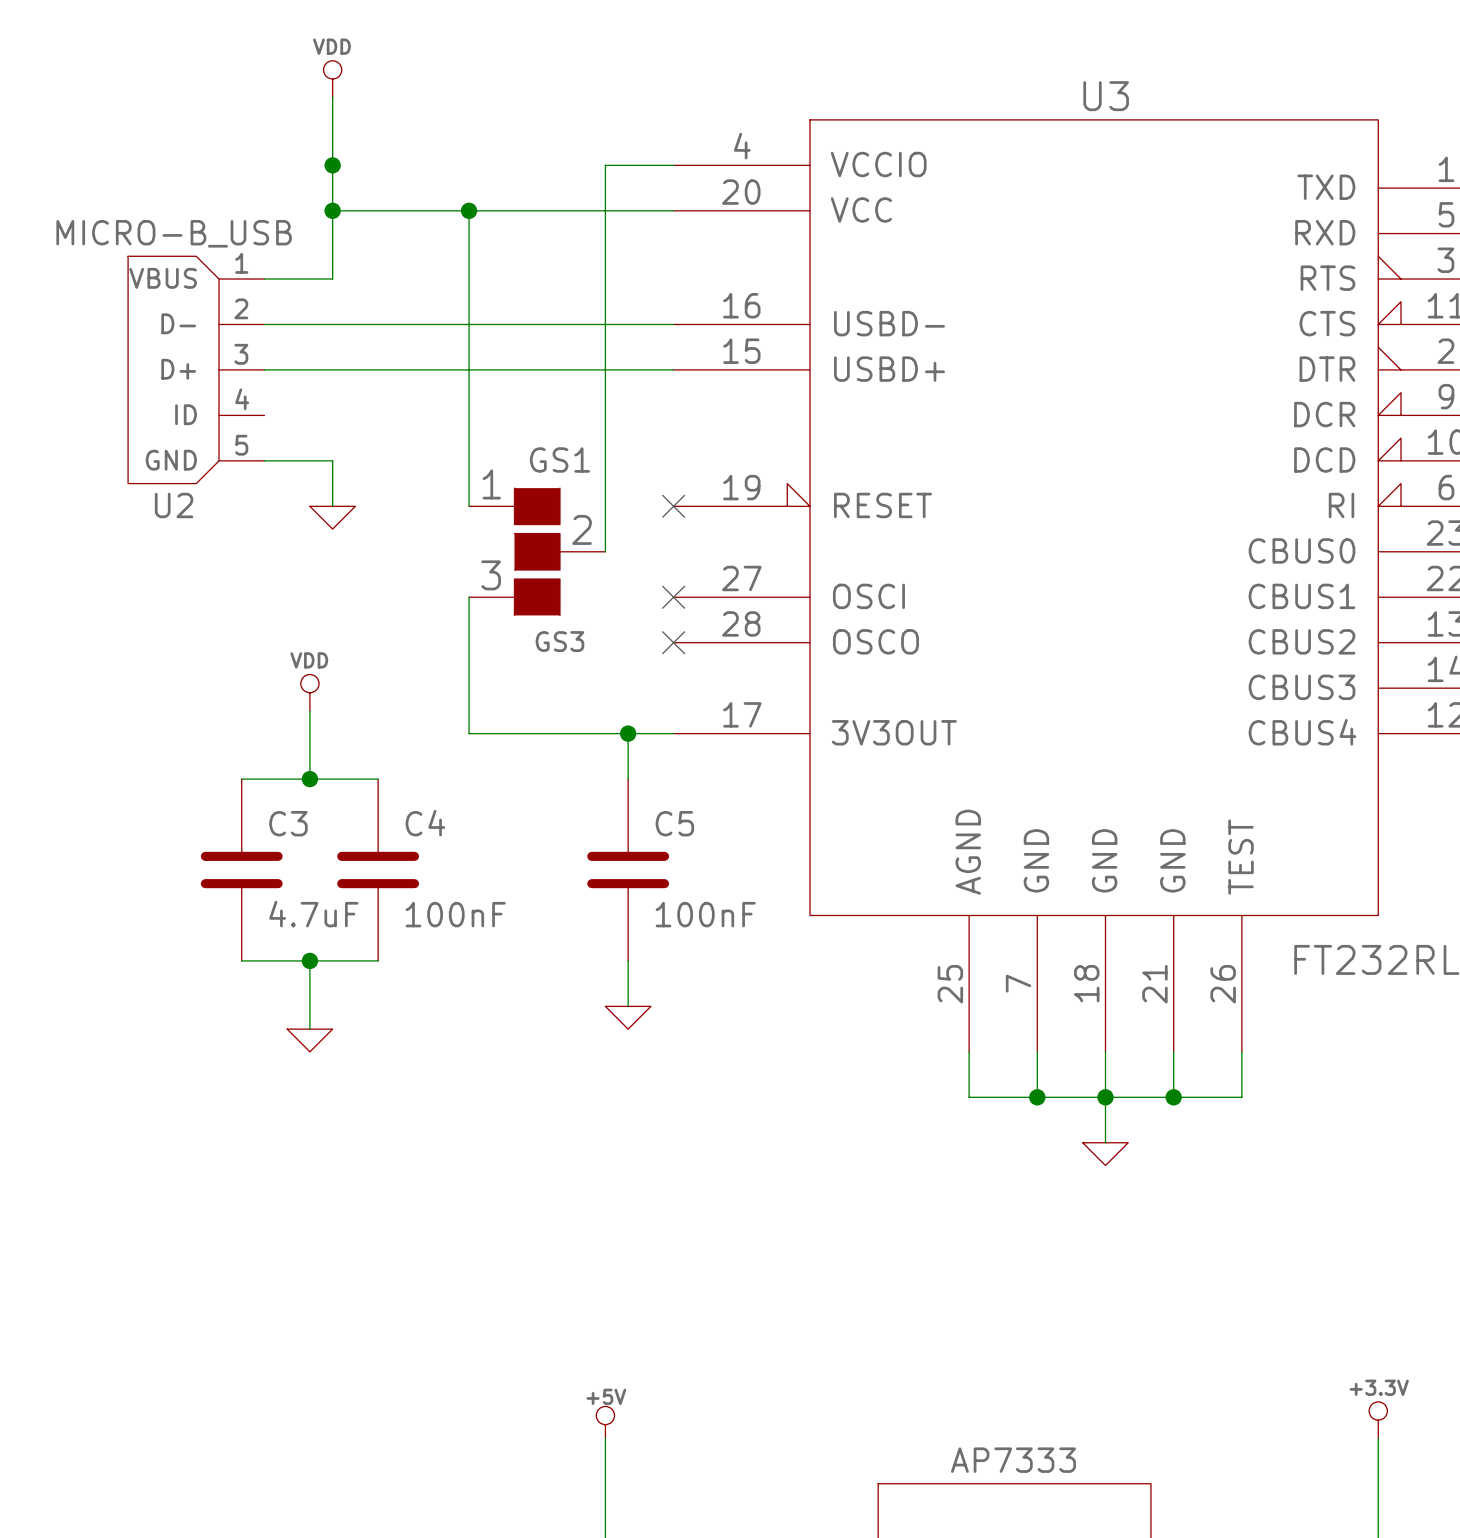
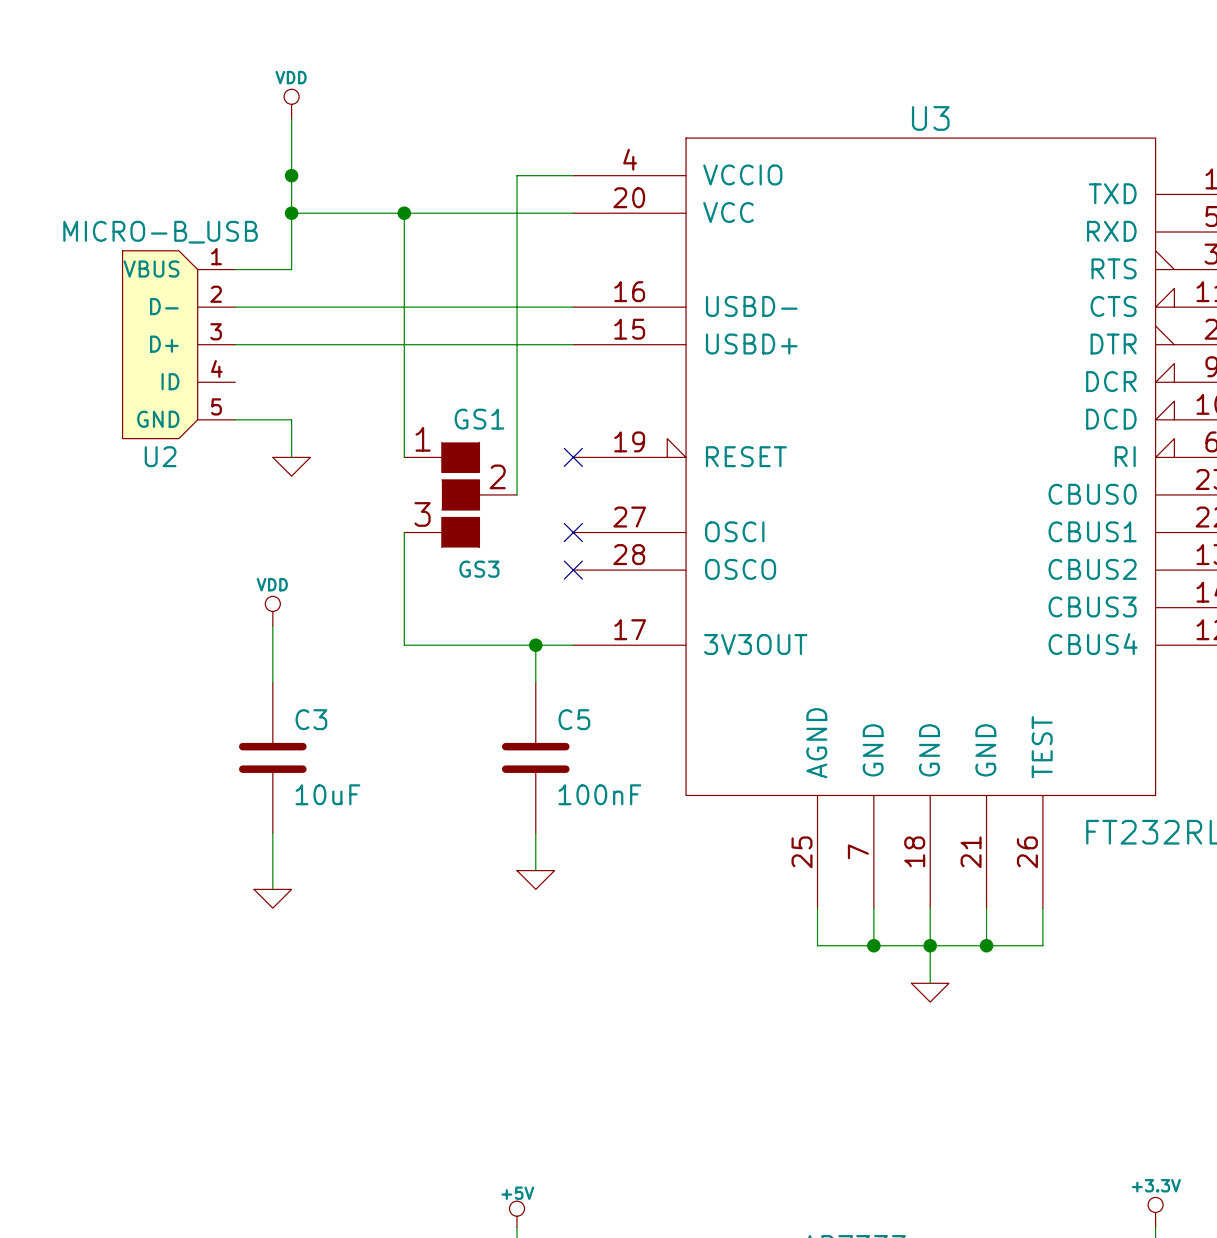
wire: (241, 779) (378, 779) -> none
junction: (309, 779) -> none
C3 position: (241, 870) -> (272, 757)
C4: 100nF (378, 870) -> none
C3 value: 4.7uF (313, 914) -> 10uF (327, 794)
wire: (241, 960) (378, 960) -> none
junction: (309, 960) -> none

